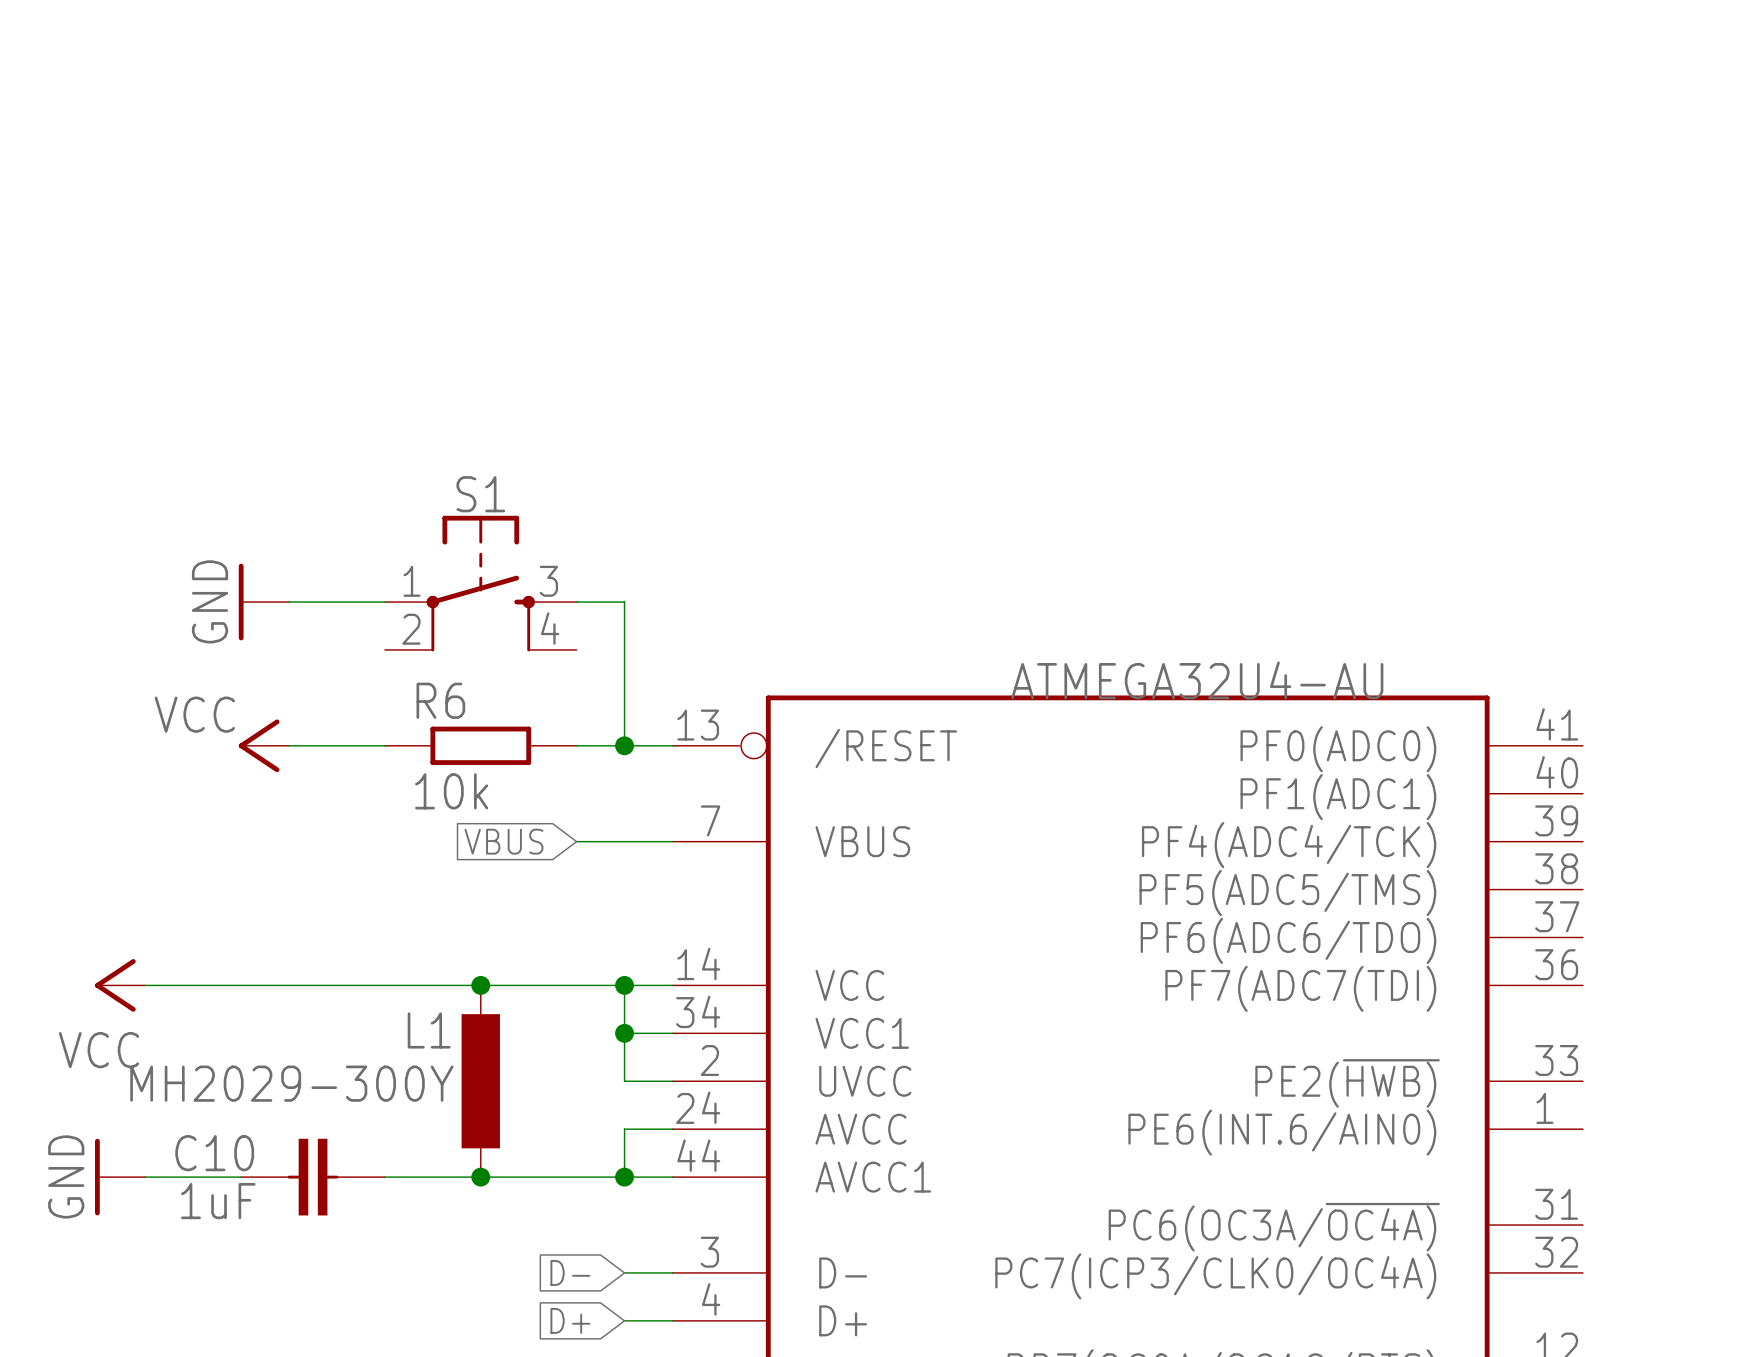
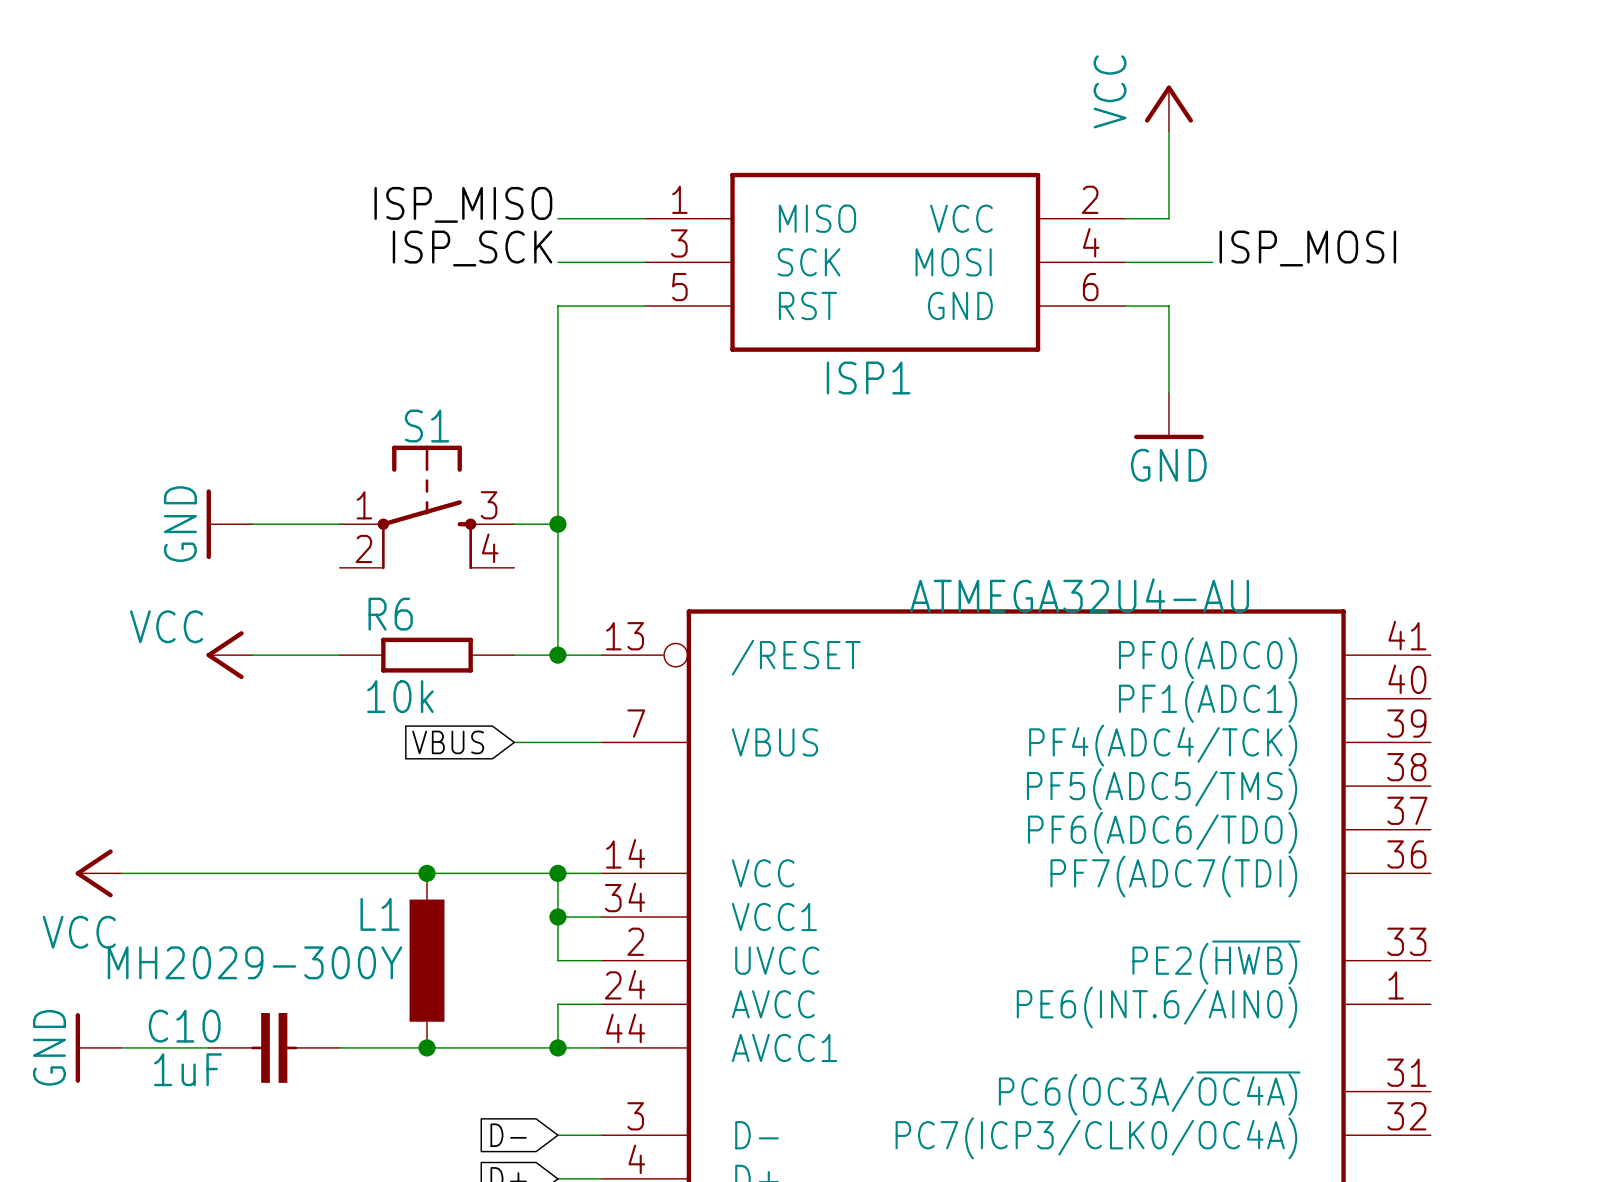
power symbol: none -> VCC (1168, 108)
wire: none -> (1168, 131) (1168, 218) (1125, 218)
label: none -> ISP_MISO (463, 204)
wire: none -> (557, 218) (645, 218)
label: none -> ISP_SCK (472, 248)
label: none -> ISP_MOSI (1307, 248)
wire: none -> (557, 262) (645, 262)
ISP1: none -> (885, 262)
wire: none -> (1125, 262) (1212, 262)
wire: none -> (645, 305) (557, 305) (557, 524)
wire: none -> (1125, 305) (1168, 305) (1168, 393)
power symbol: none -> GND (1168, 416)
junction: none -> (557, 524)

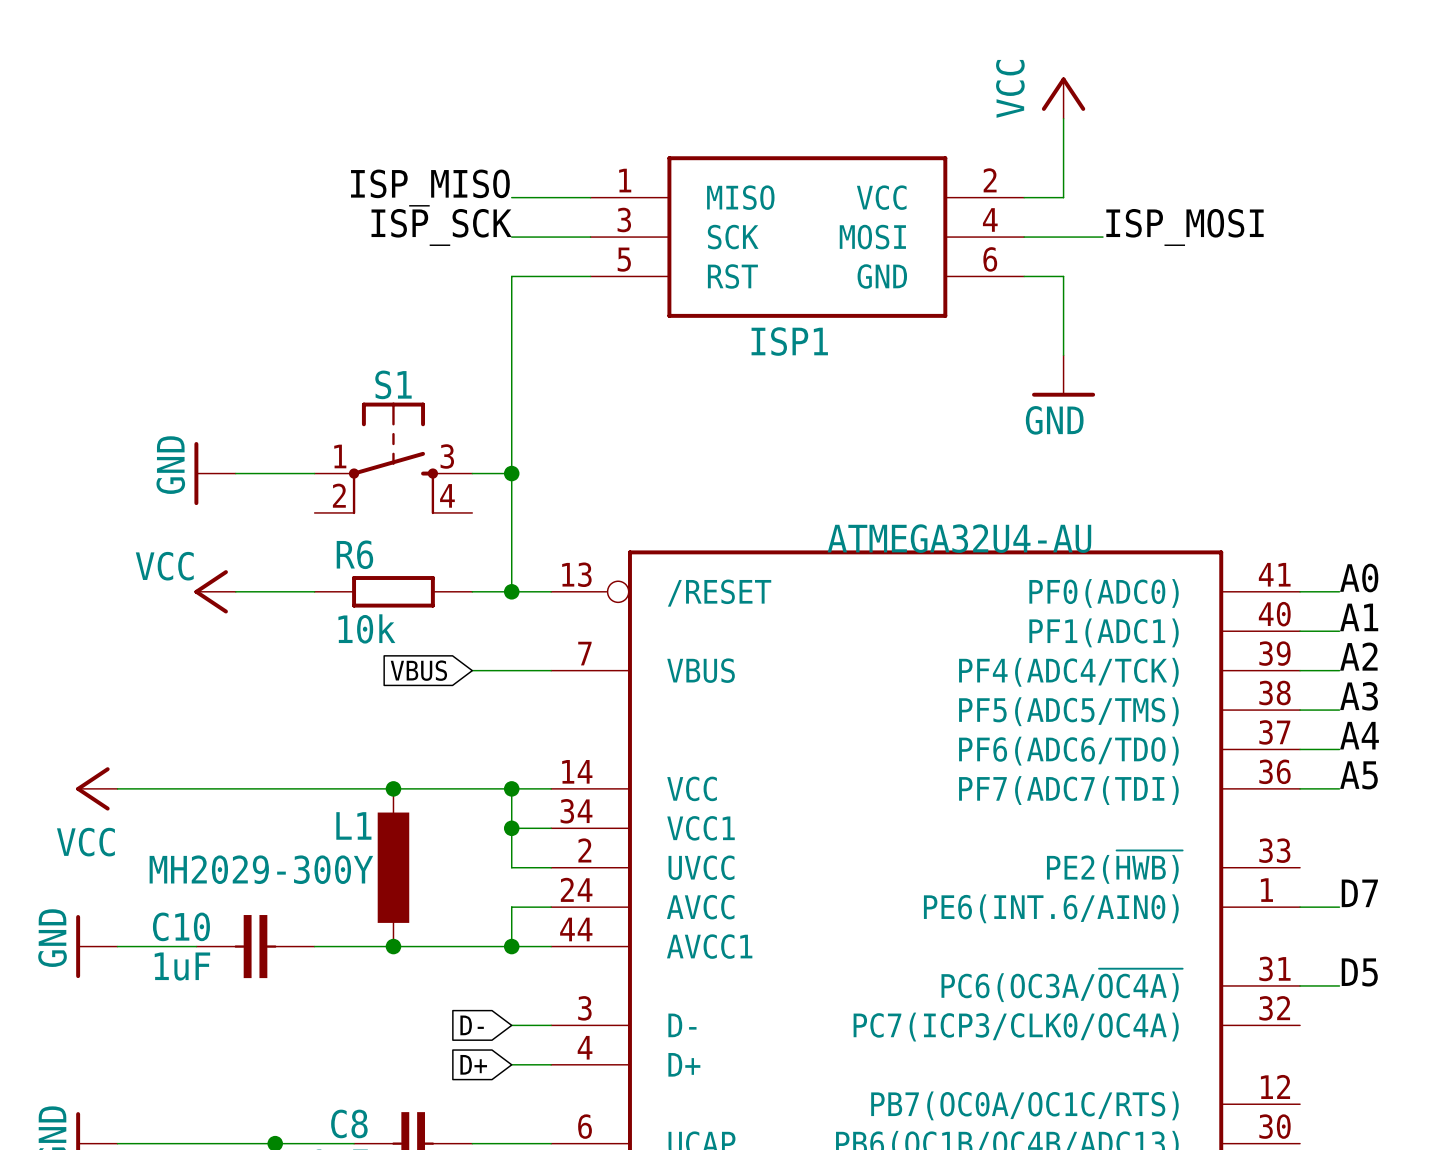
label: none -> A0 (1359, 578)
wire: none -> (1300, 591) (1339, 591)
label: none -> A1 (1359, 617)
wire: none -> (1300, 631) (1339, 631)
label: none -> A2 (1358, 656)
wire: none -> (1300, 670) (1339, 670)
label: none -> A3 (1359, 696)
wire: none -> (1300, 710) (1339, 710)
label: none -> A4 (1359, 735)
wire: none -> (1300, 749) (1339, 749)
label: none -> A5 (1358, 775)
wire: none -> (1300, 788) (1339, 788)
label: none -> D7 (1359, 893)
wire: none -> (1300, 907) (1339, 907)
label: none -> D5 (1359, 972)
wire: none -> (1300, 985) (1339, 985)

